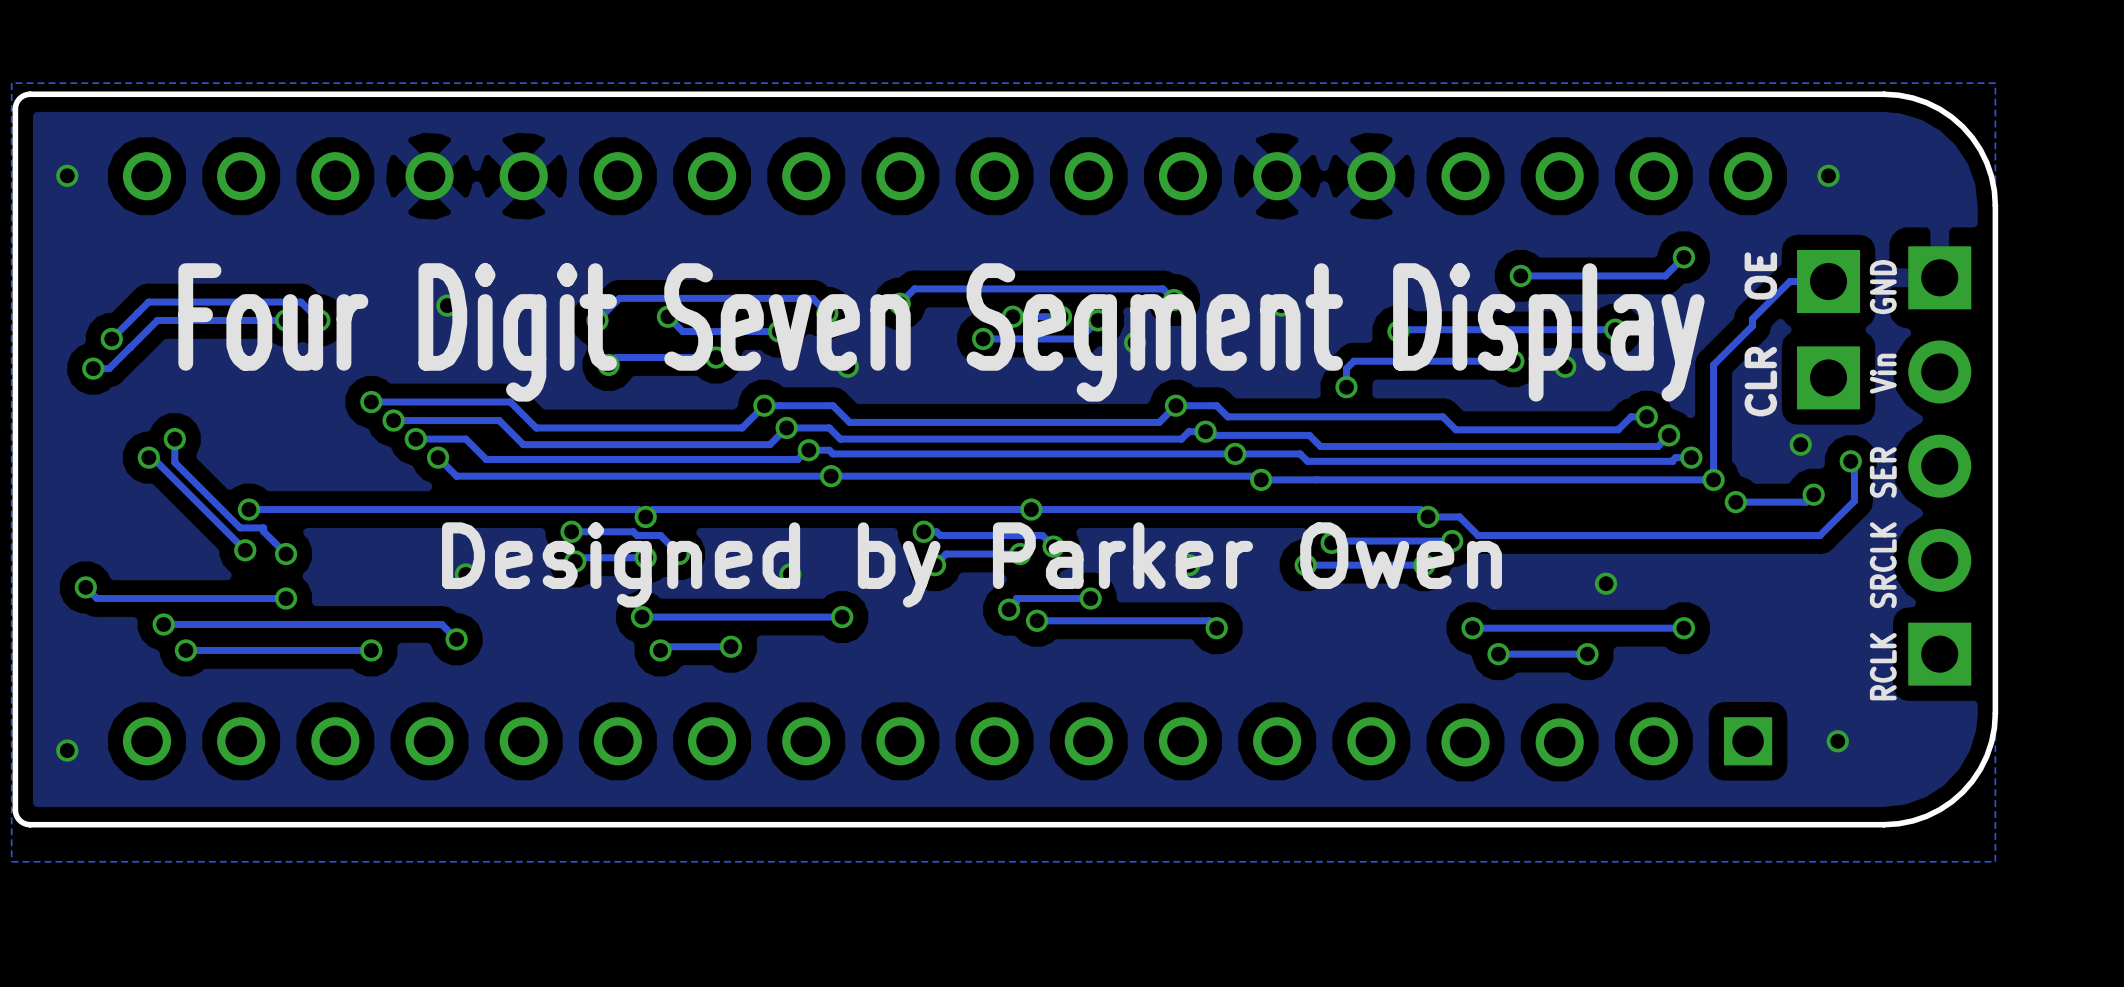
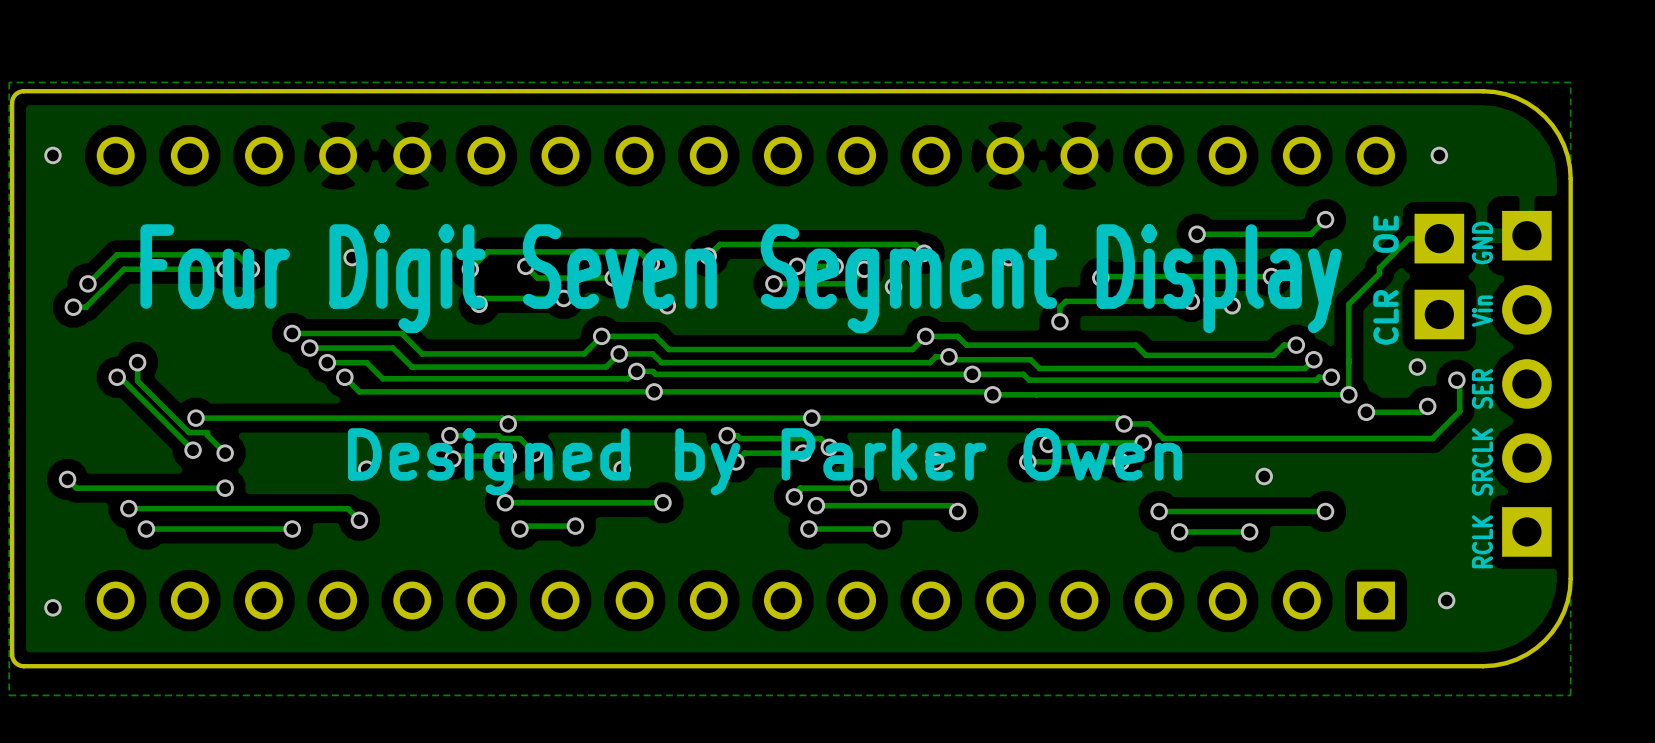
via: none -> (808, 529)
track: none -> (881, 529) (808, 529)
via: none -> (881, 529)

